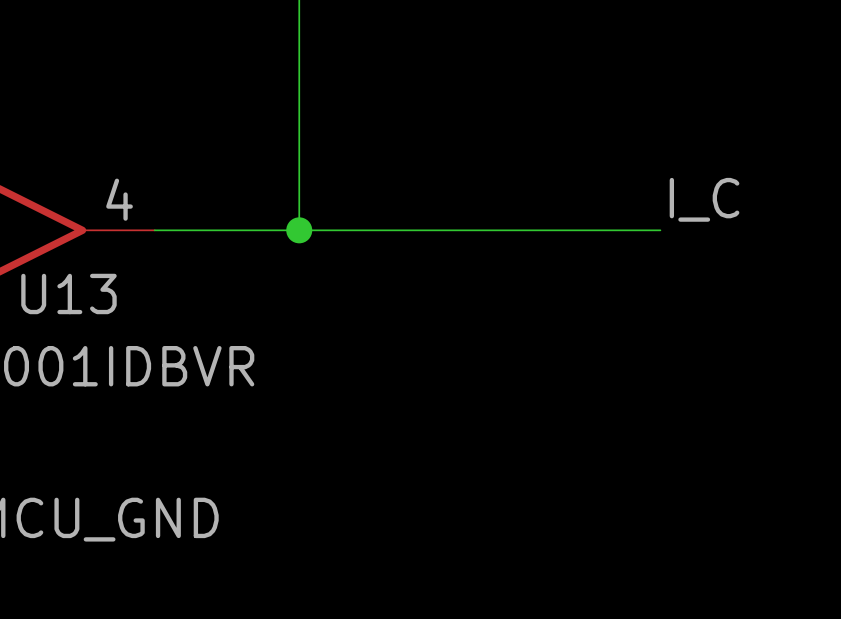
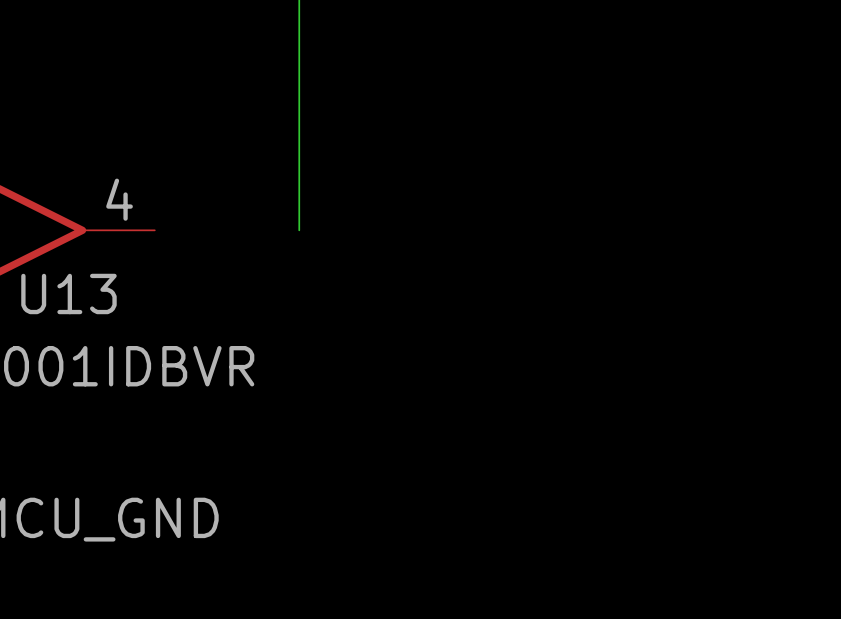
label: I_C (704, 199) -> none
wire: (154, 230) (660, 230) -> none
junction: (299, 230) -> none

